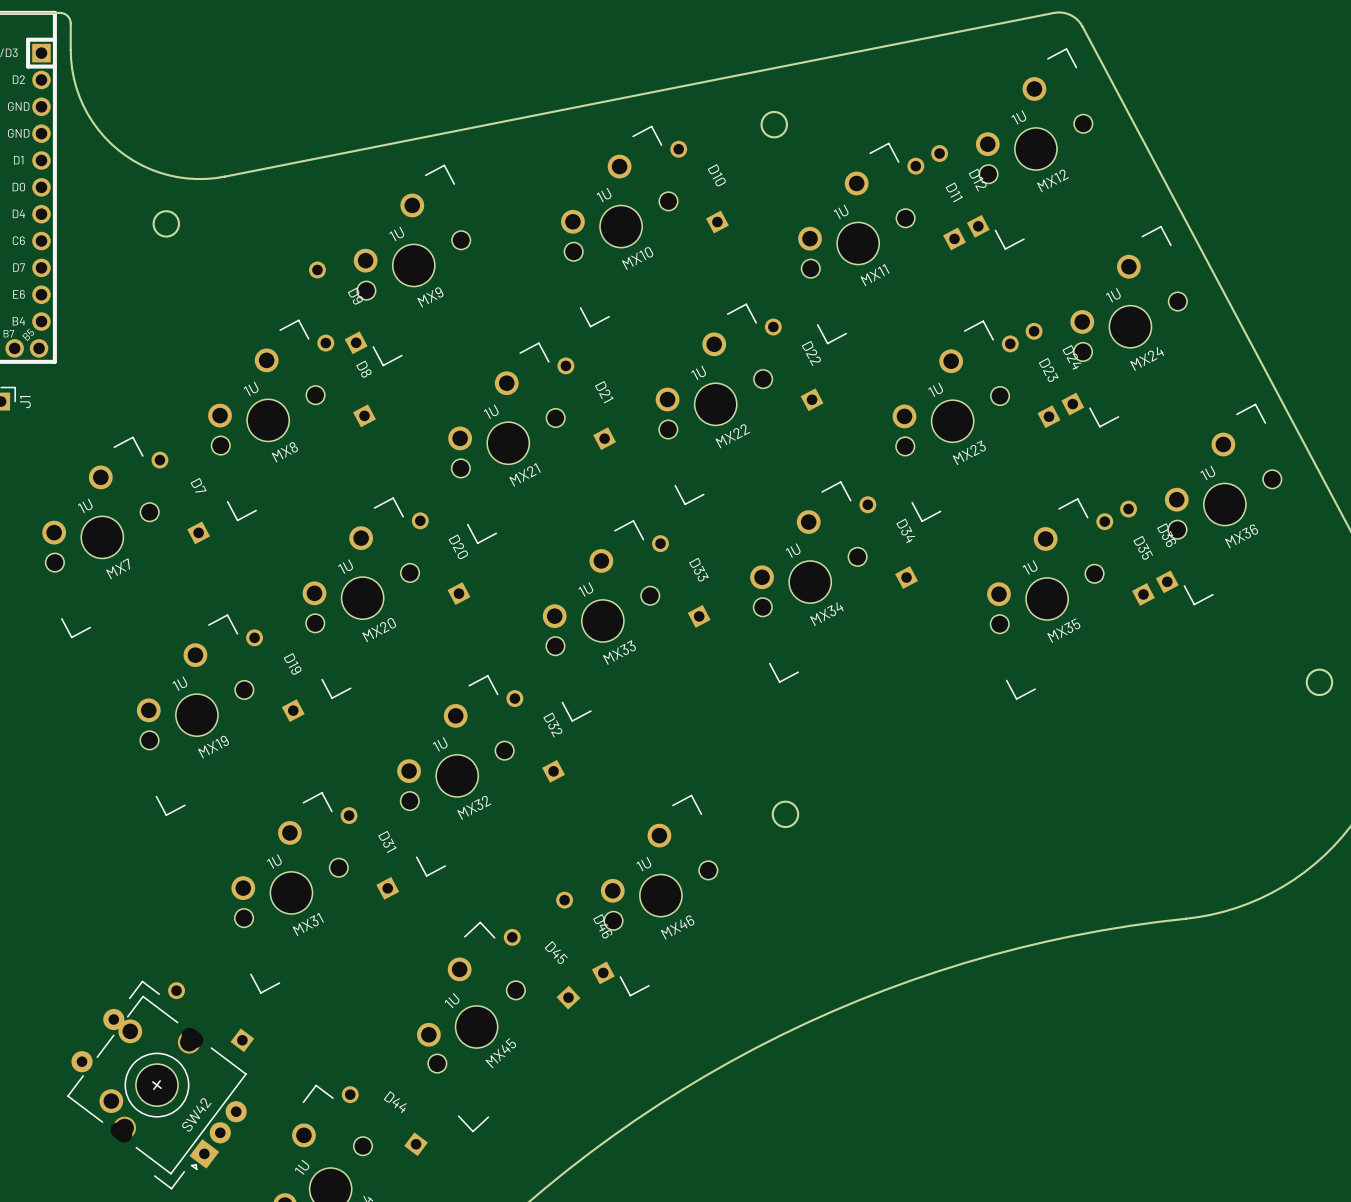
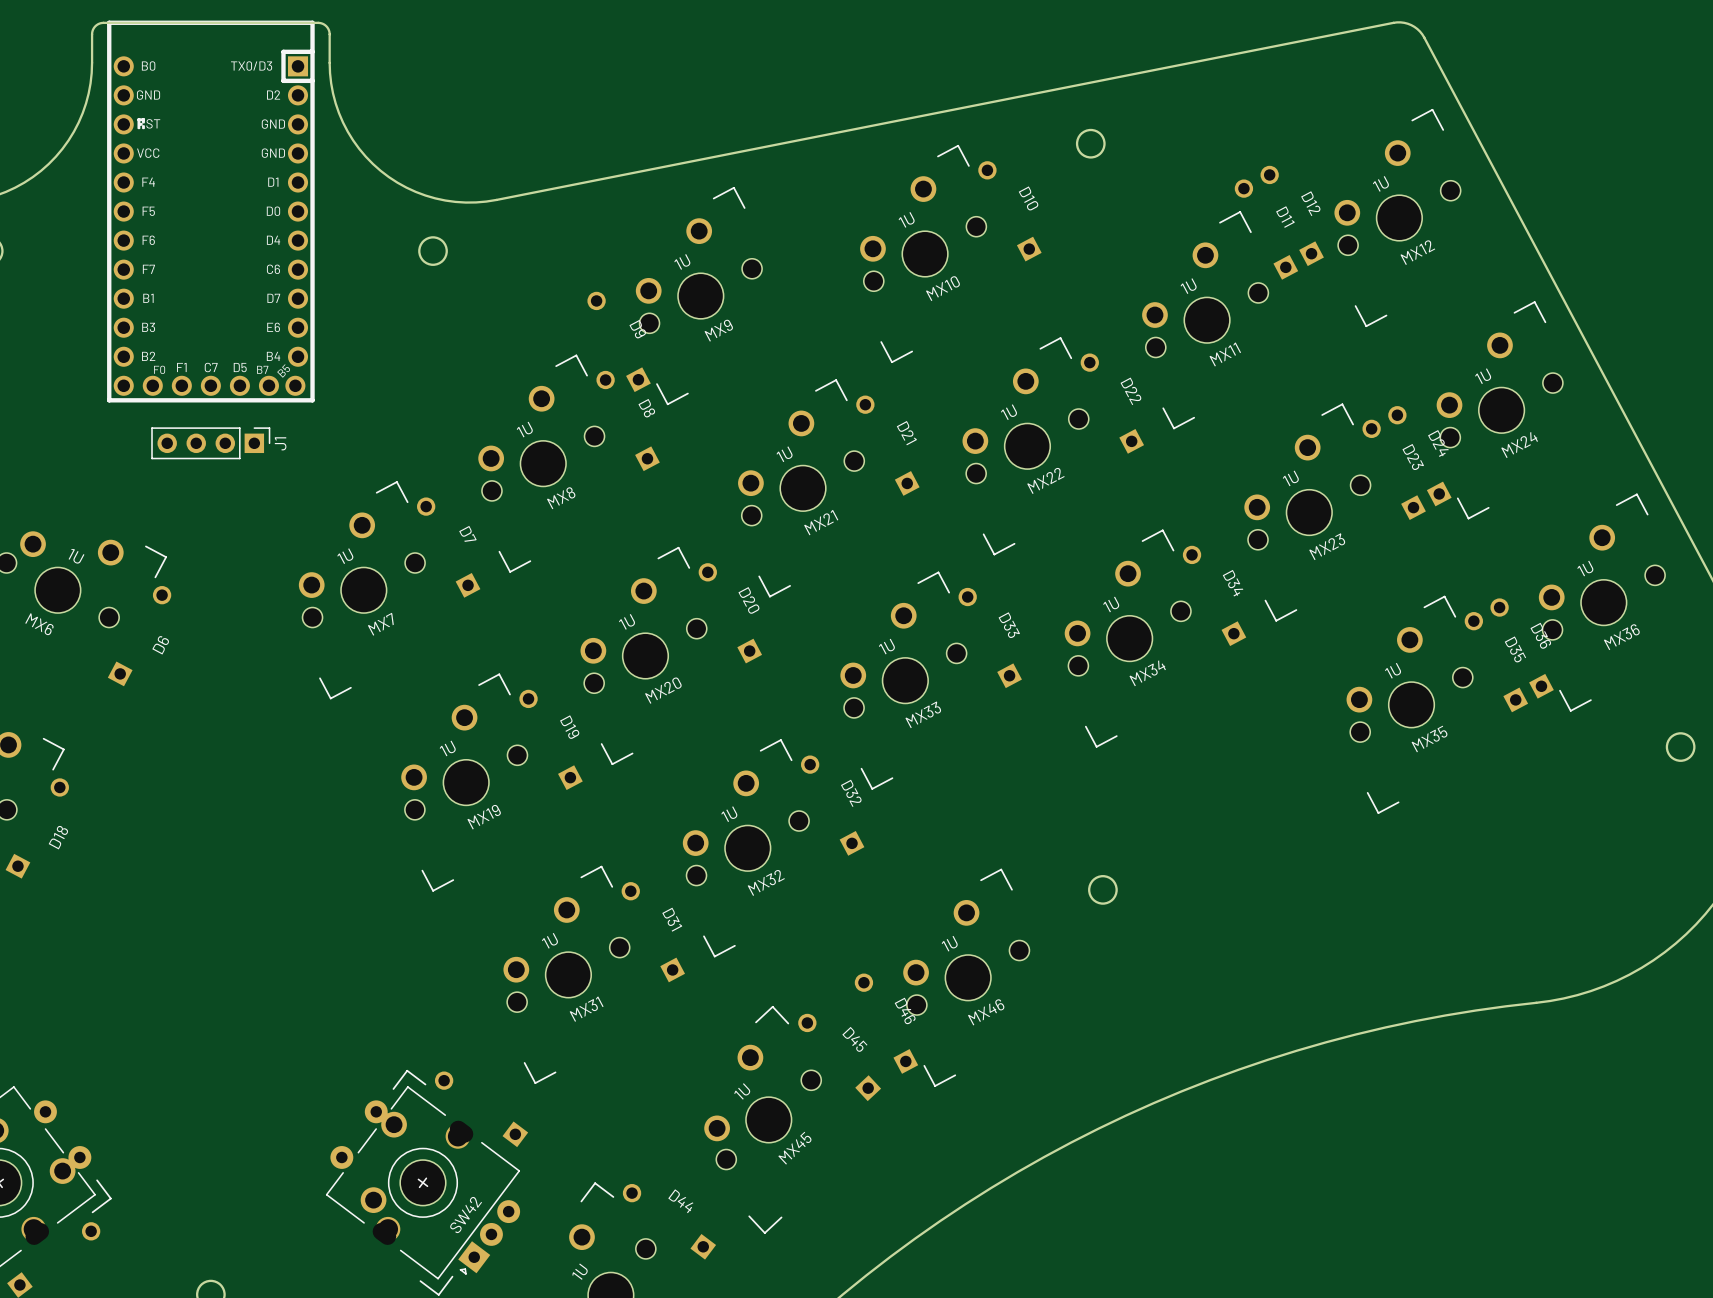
MX12 position: (1034, 148) -> (1397, 218)
MX11 position: (856, 243) -> (1205, 320)
MX24 position: (1128, 326) -> (1499, 410)
D24 position: (1054, 369) -> (1419, 456)
D23 position: (1031, 381) -> (1394, 469)
MX23 position: (950, 421) -> (1307, 512)
MX36 position: (1223, 504) -> (1601, 602)
D36 position: (1149, 546) -> (1522, 648)
D35 position: (1125, 559) -> (1496, 662)
MX35 position: (1045, 598) -> (1409, 704)

